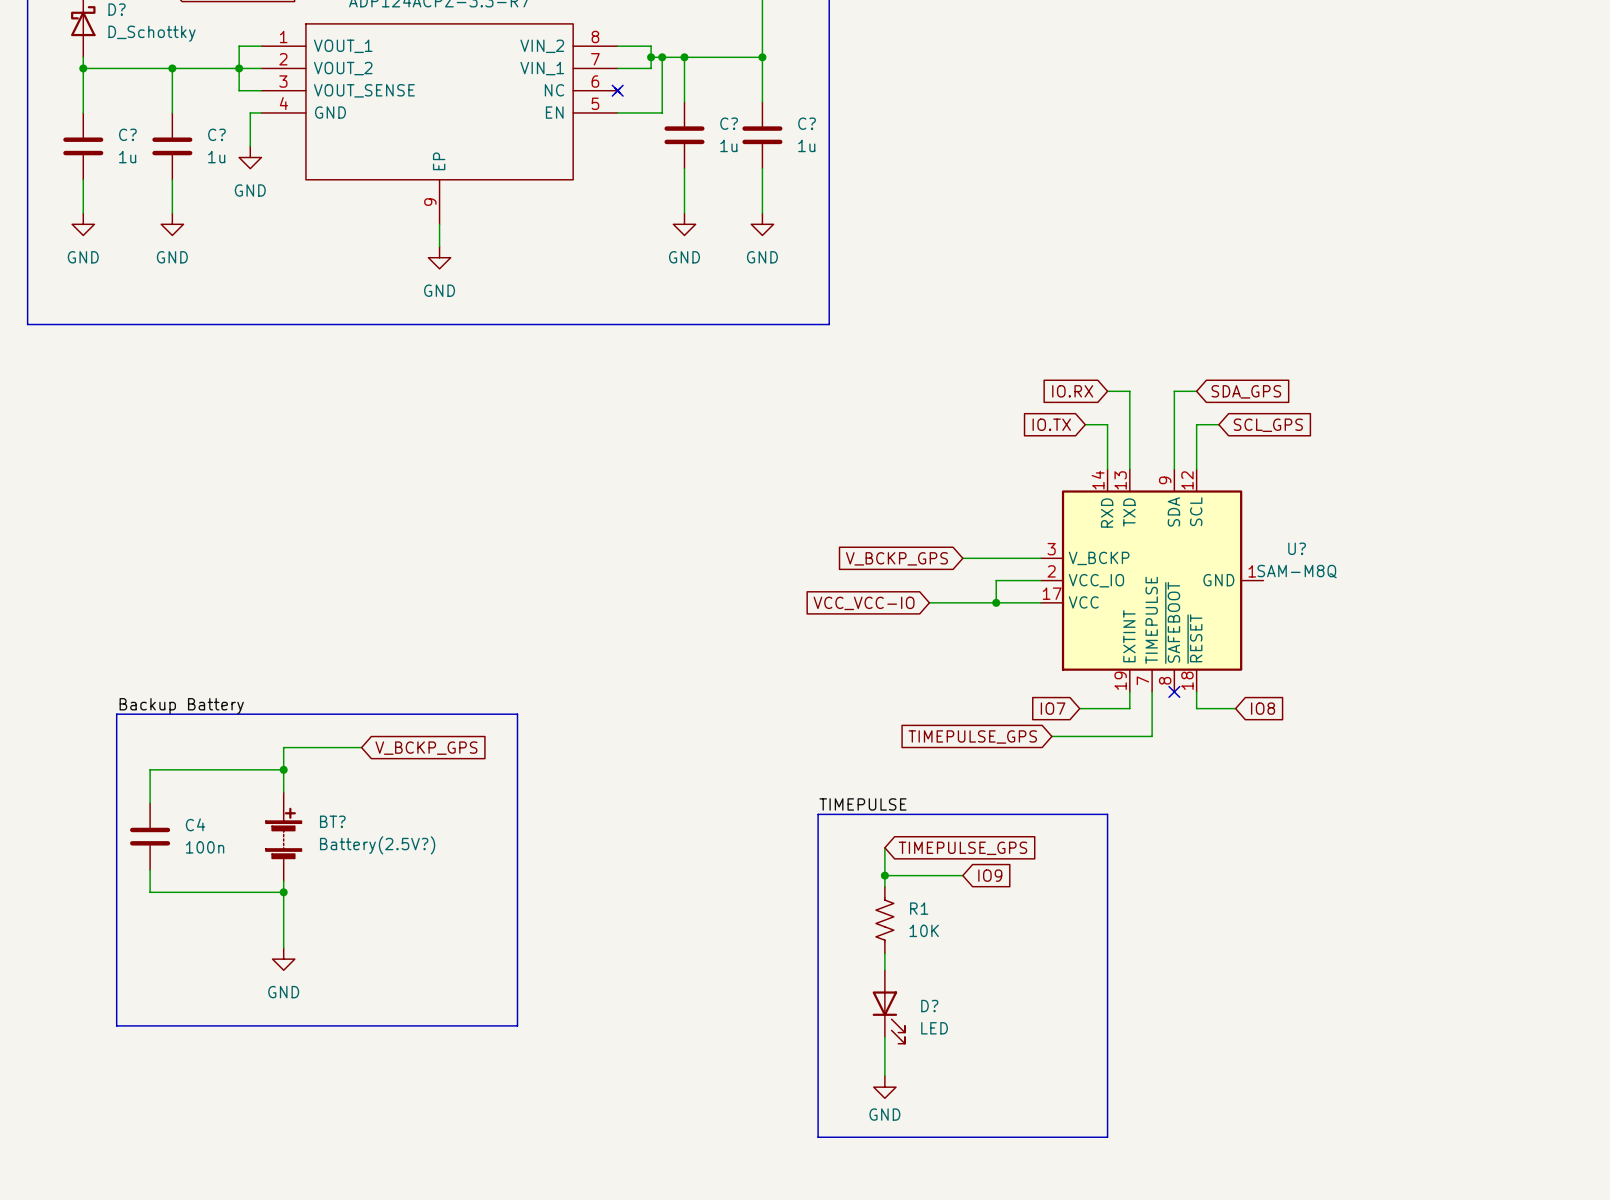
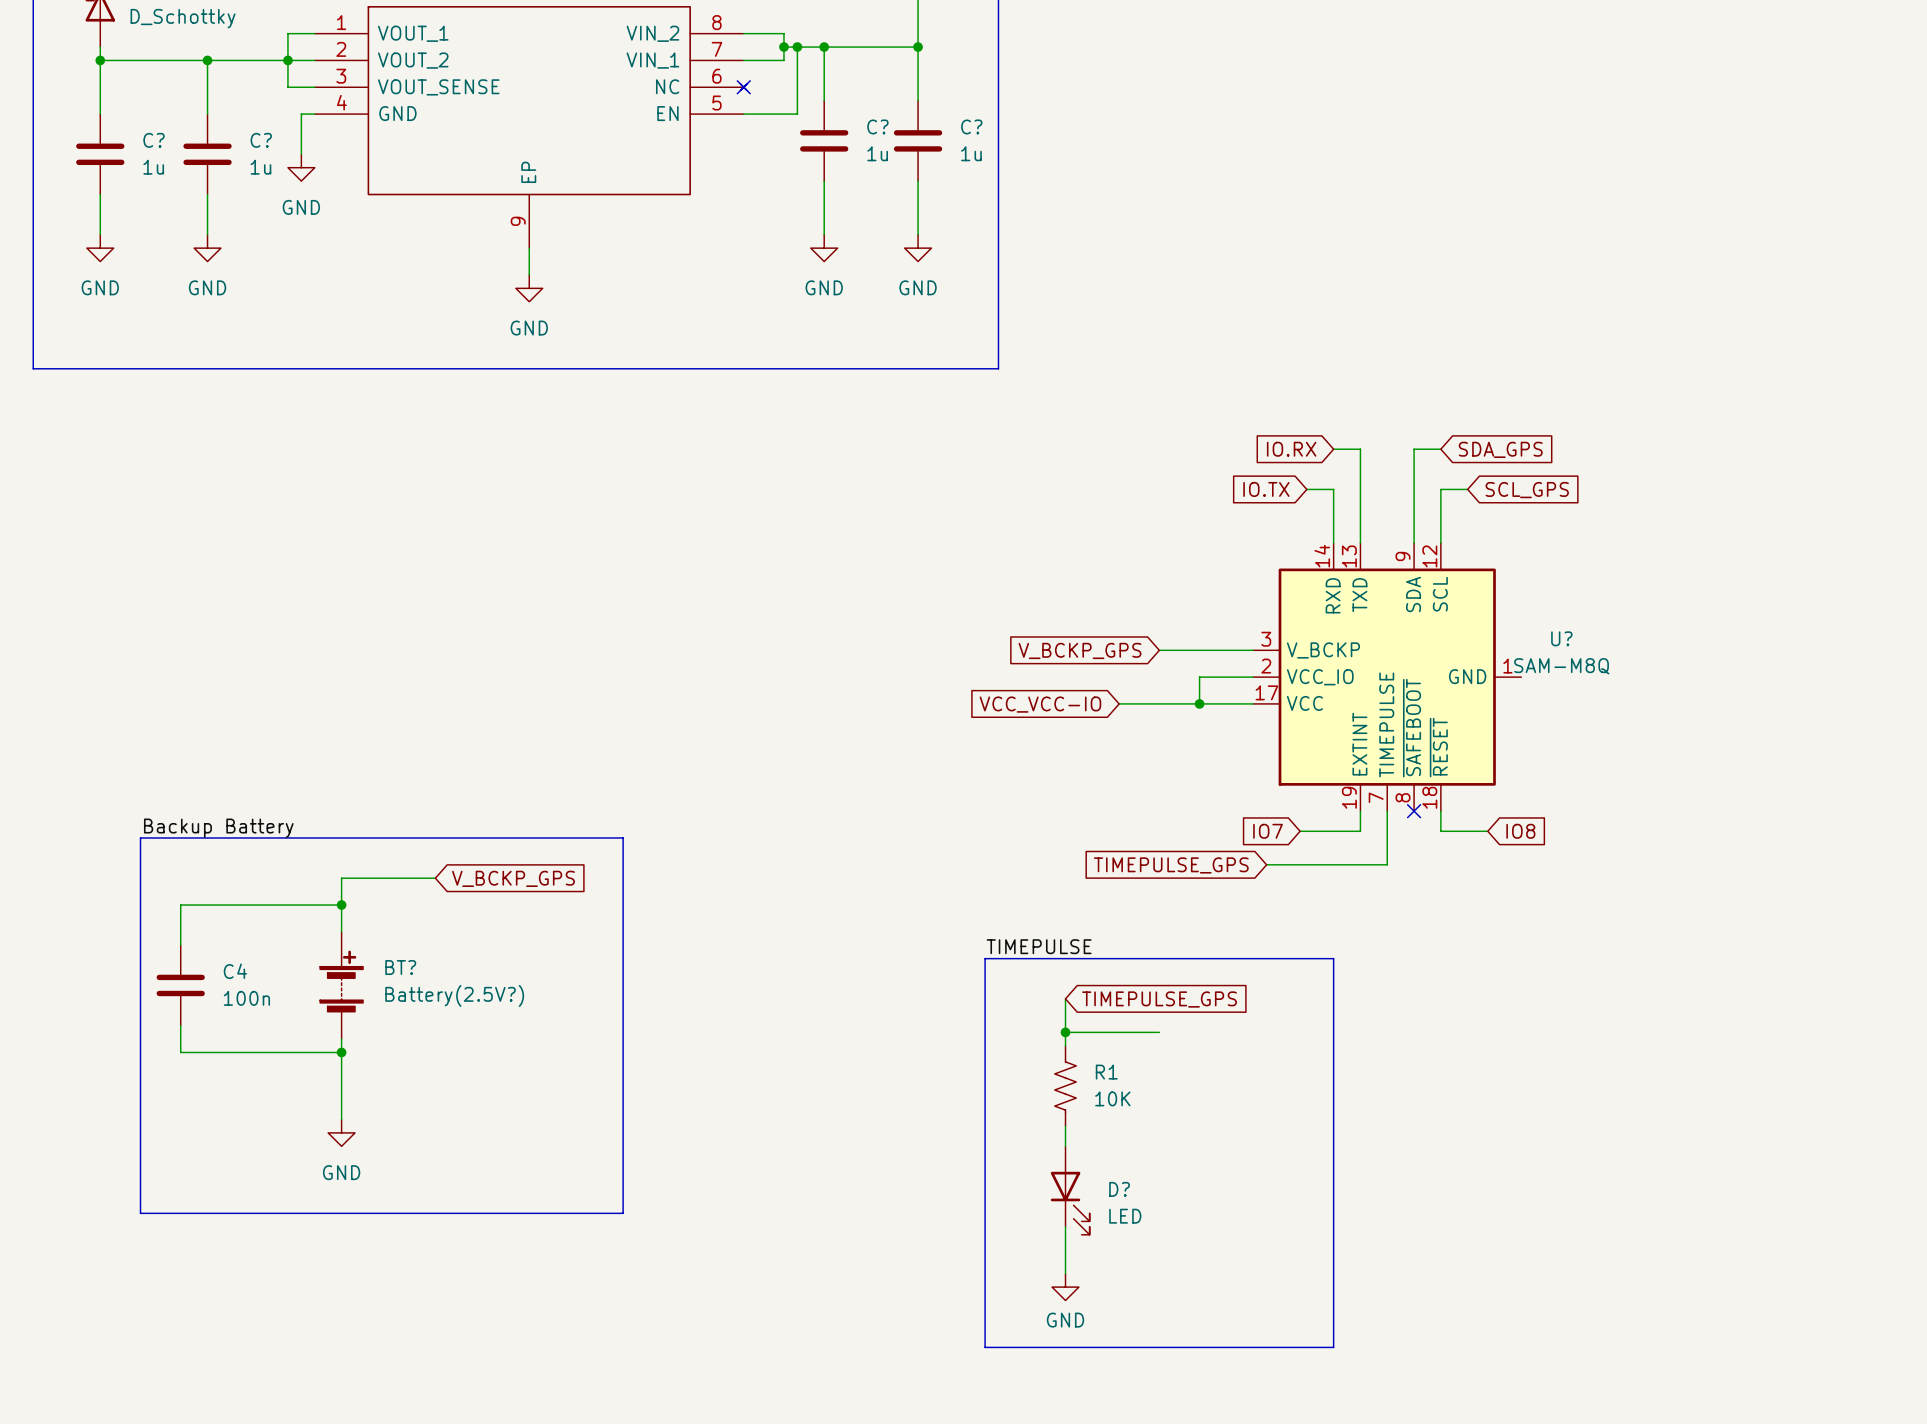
global label: IO9 (990, 875) -> none

